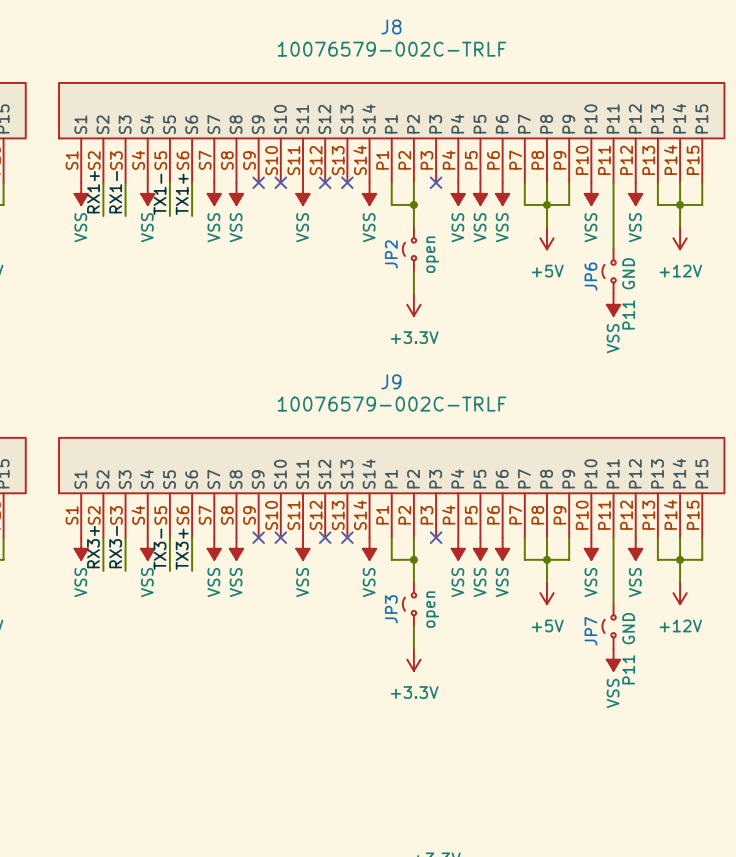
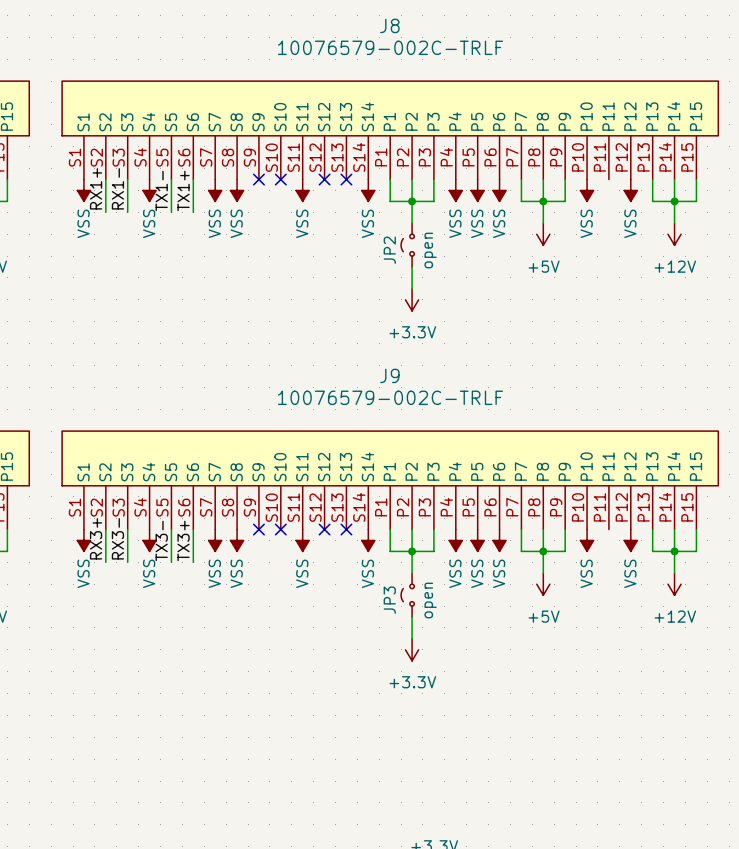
wire: none -> (433, 179) (433, 201) (412, 201)
no-connect mark: (436, 182) -> none
wire: (613, 182) (613, 249) -> none
JP6: P11 GND (609, 271) -> none
power symbol: VSS (613, 304) -> none
wire: none -> (433, 529) (433, 551) (412, 551)
no-connect mark: (436, 537) -> none
wire: (613, 537) (613, 604) -> none
JP7: P11 GND (609, 626) -> none
power symbol: VSS (613, 659) -> none

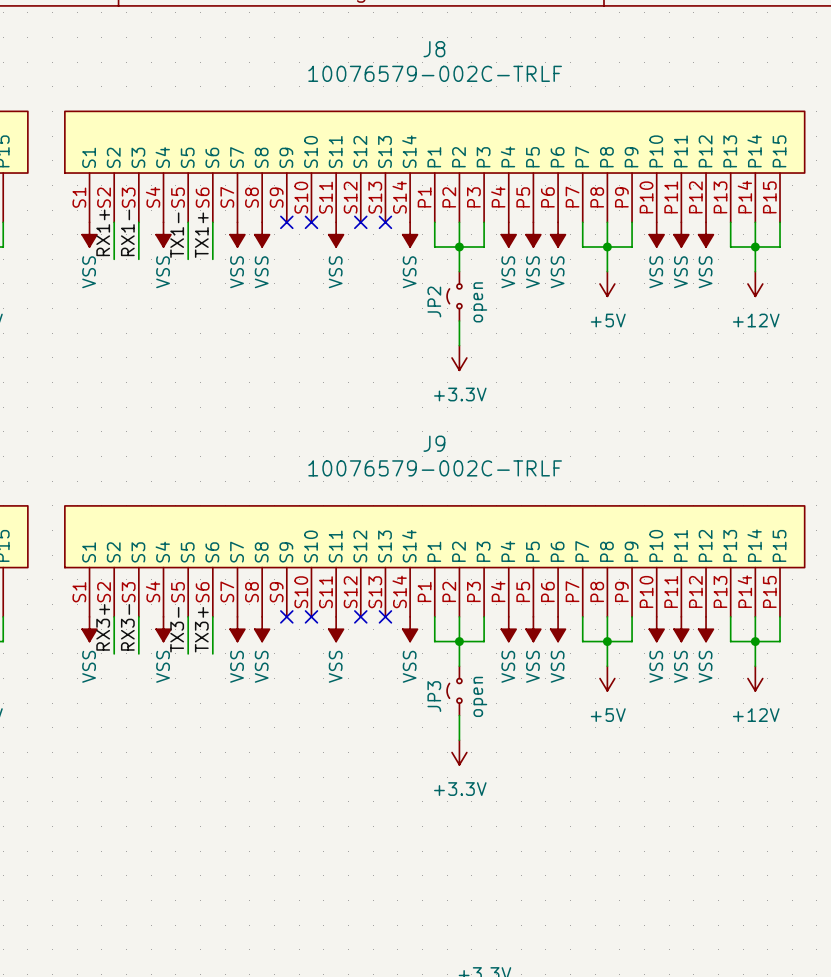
power symbol: none -> VSS (681, 234)
power symbol: none -> VSS (681, 629)

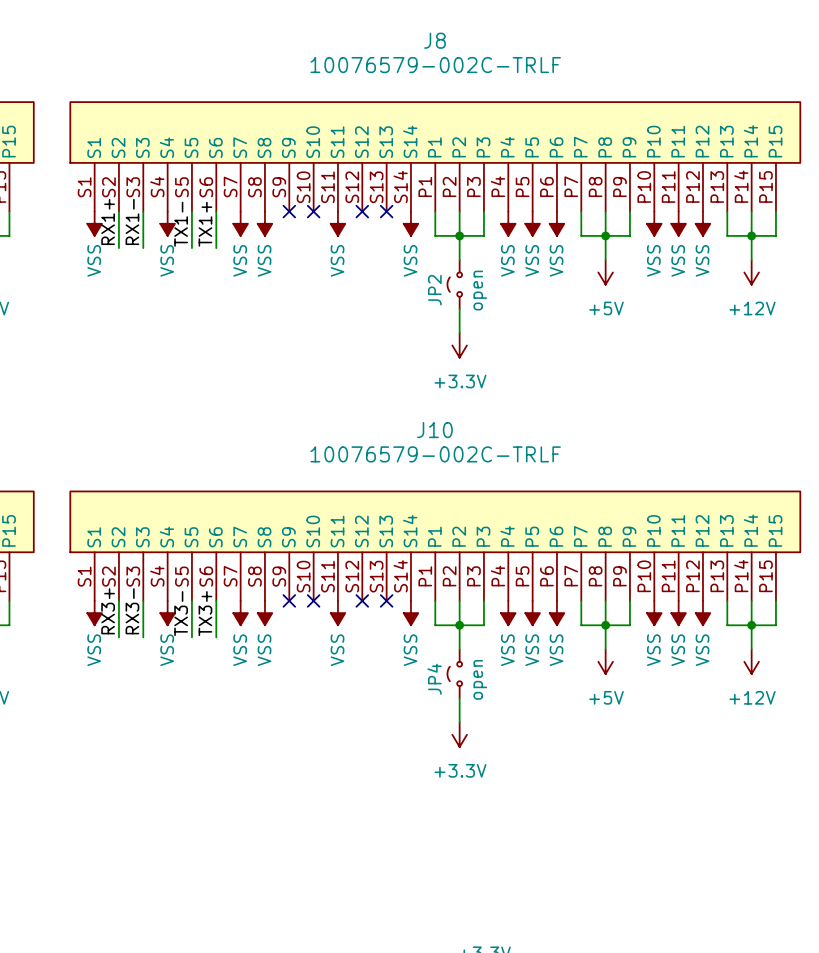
J9 name: J9 (434, 443) -> J10 (434, 430)
JP3 name: JP3 (434, 696) -> JP4 (434, 679)

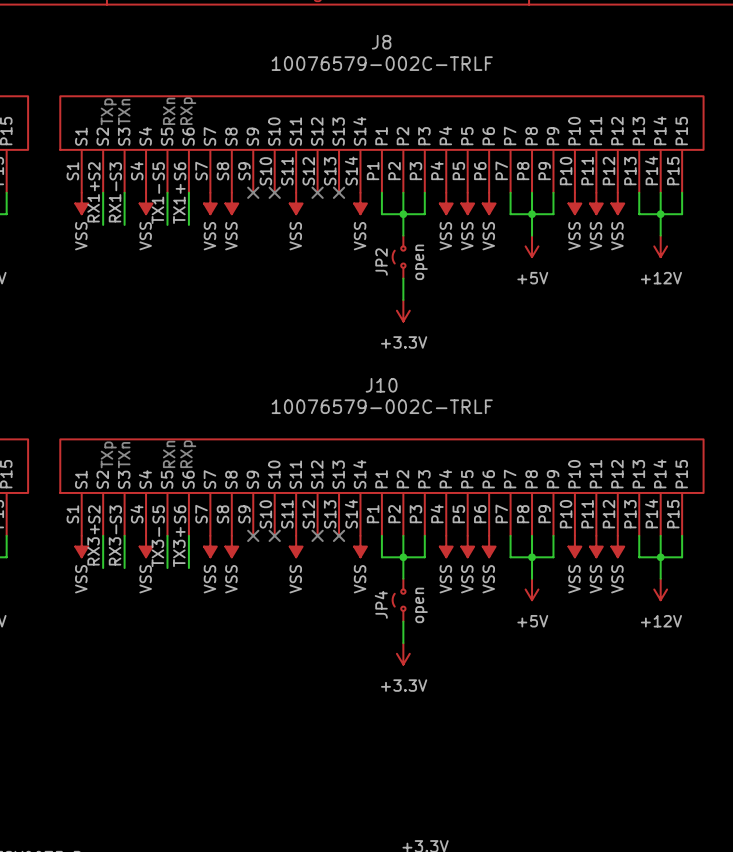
text: none -> RXp (188, 111)
text: none -> TXp (108, 111)
text: none -> RXn (169, 111)
text: none -> TXn (124, 112)
text: none -> RXn (169, 454)
text: none -> RXp (188, 454)
text: none -> TXp (108, 454)
text: none -> TXn (124, 455)

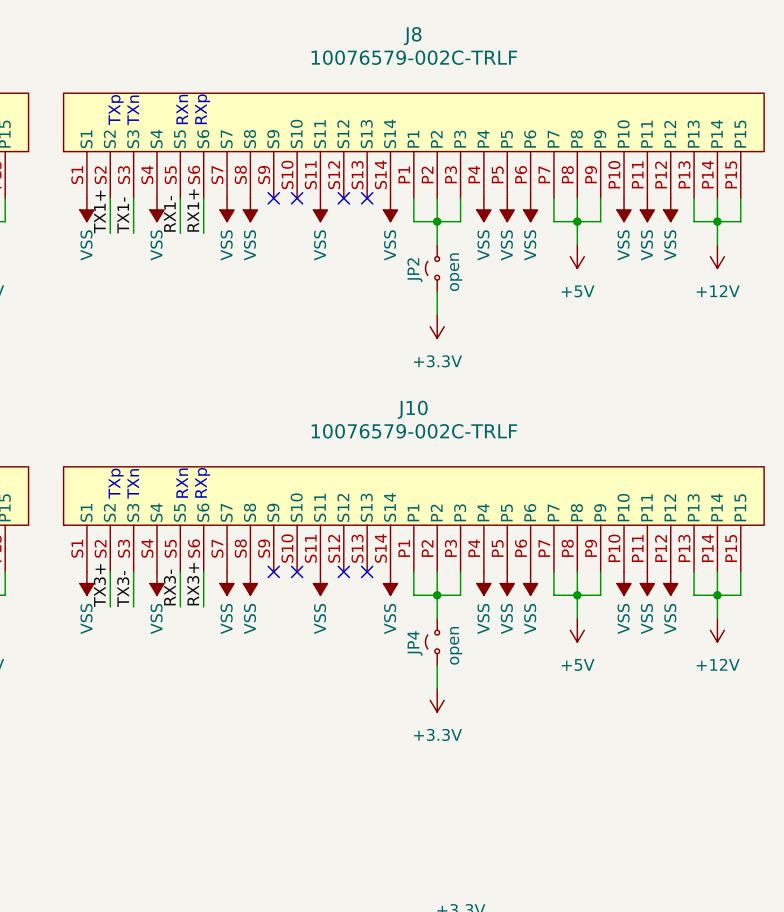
label: RX1+ (93, 201) -> TX1+ (99, 212)
label: RX1- (115, 201) -> TX1- (123, 215)
label: TX1- (157, 203) -> RX1- (169, 213)
label: TX1+ (179, 203) -> RX1+ (193, 210)
label: RX3+ (93, 544) -> TX3+ (99, 585)
label: RX3- (115, 544) -> TX3- (123, 588)
label: TX3- (157, 547) -> RX3- (169, 587)
label: TX3+ (179, 547) -> RX3+ (193, 584)

